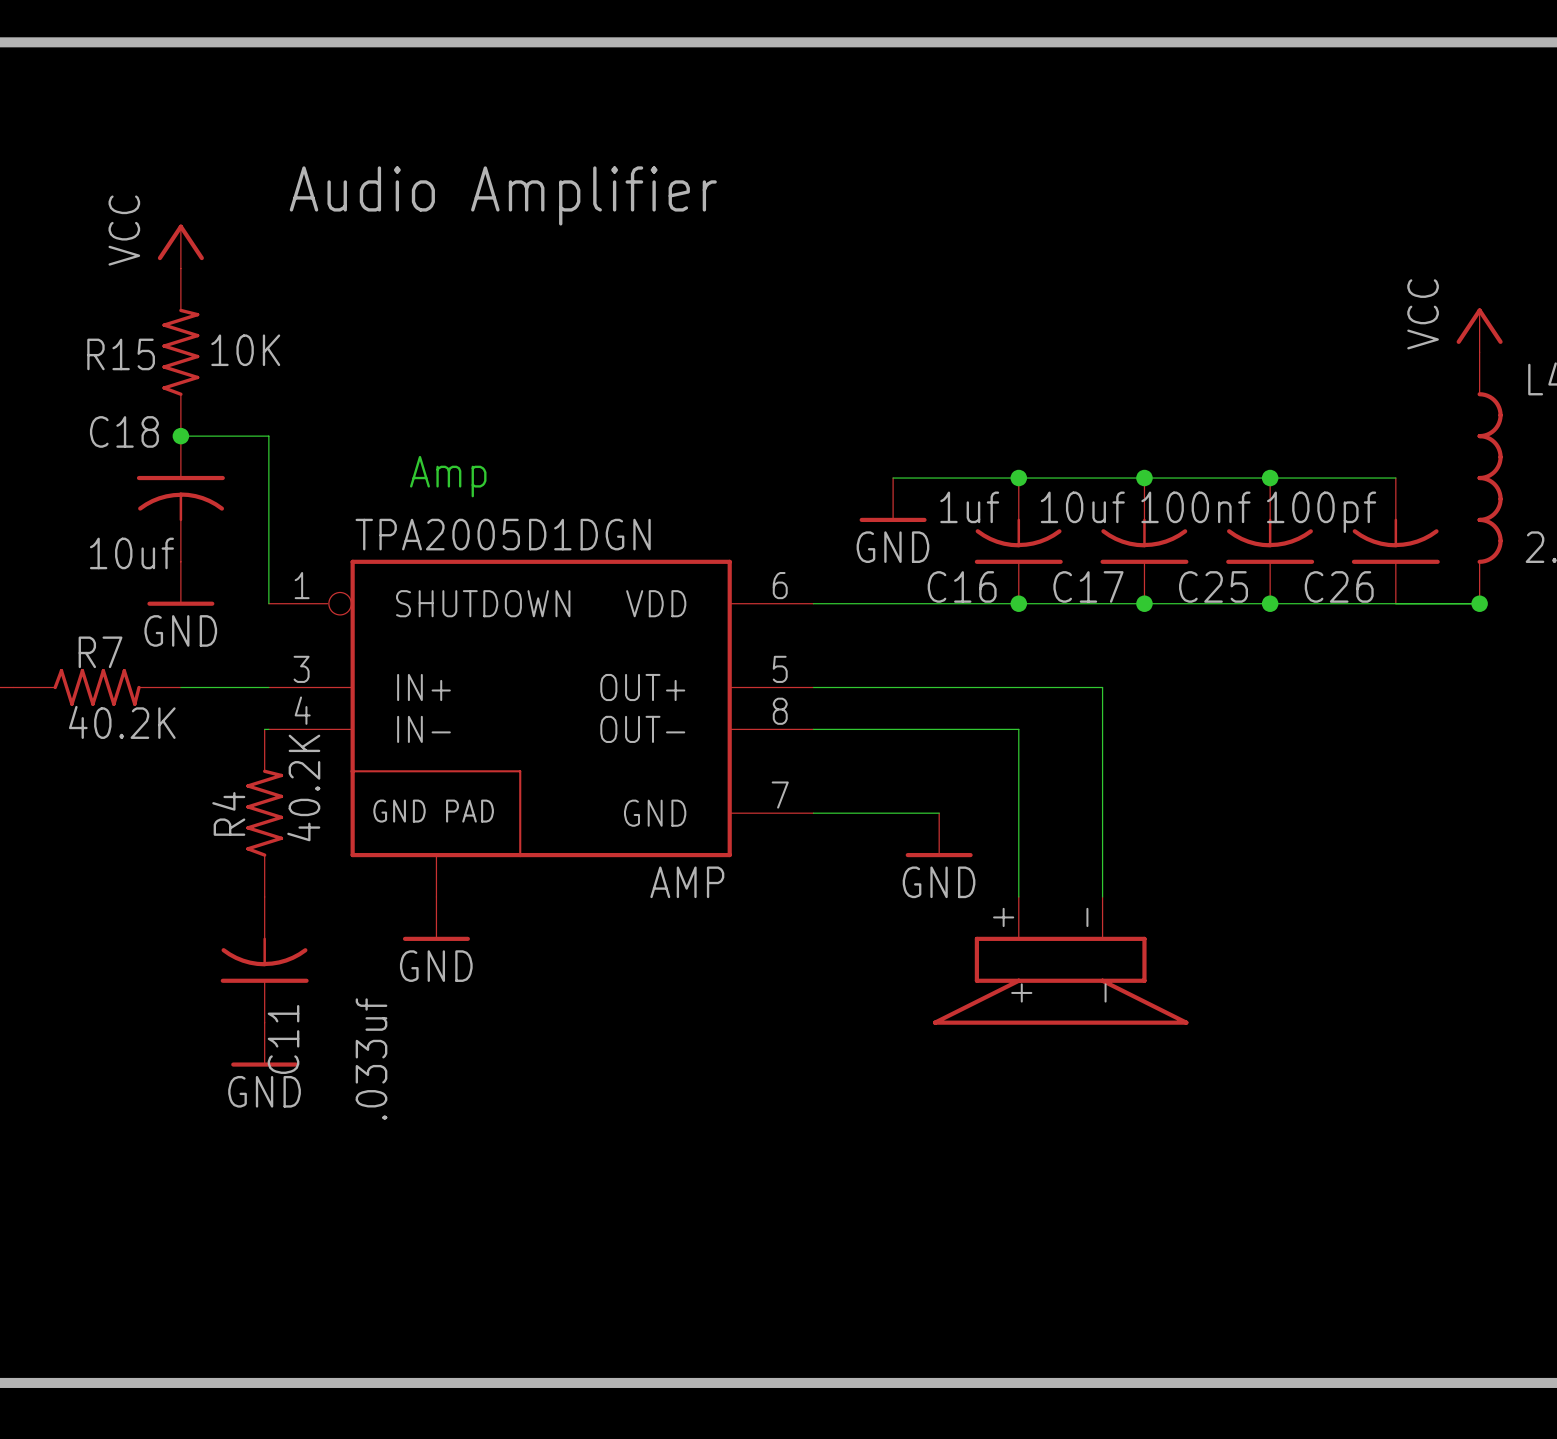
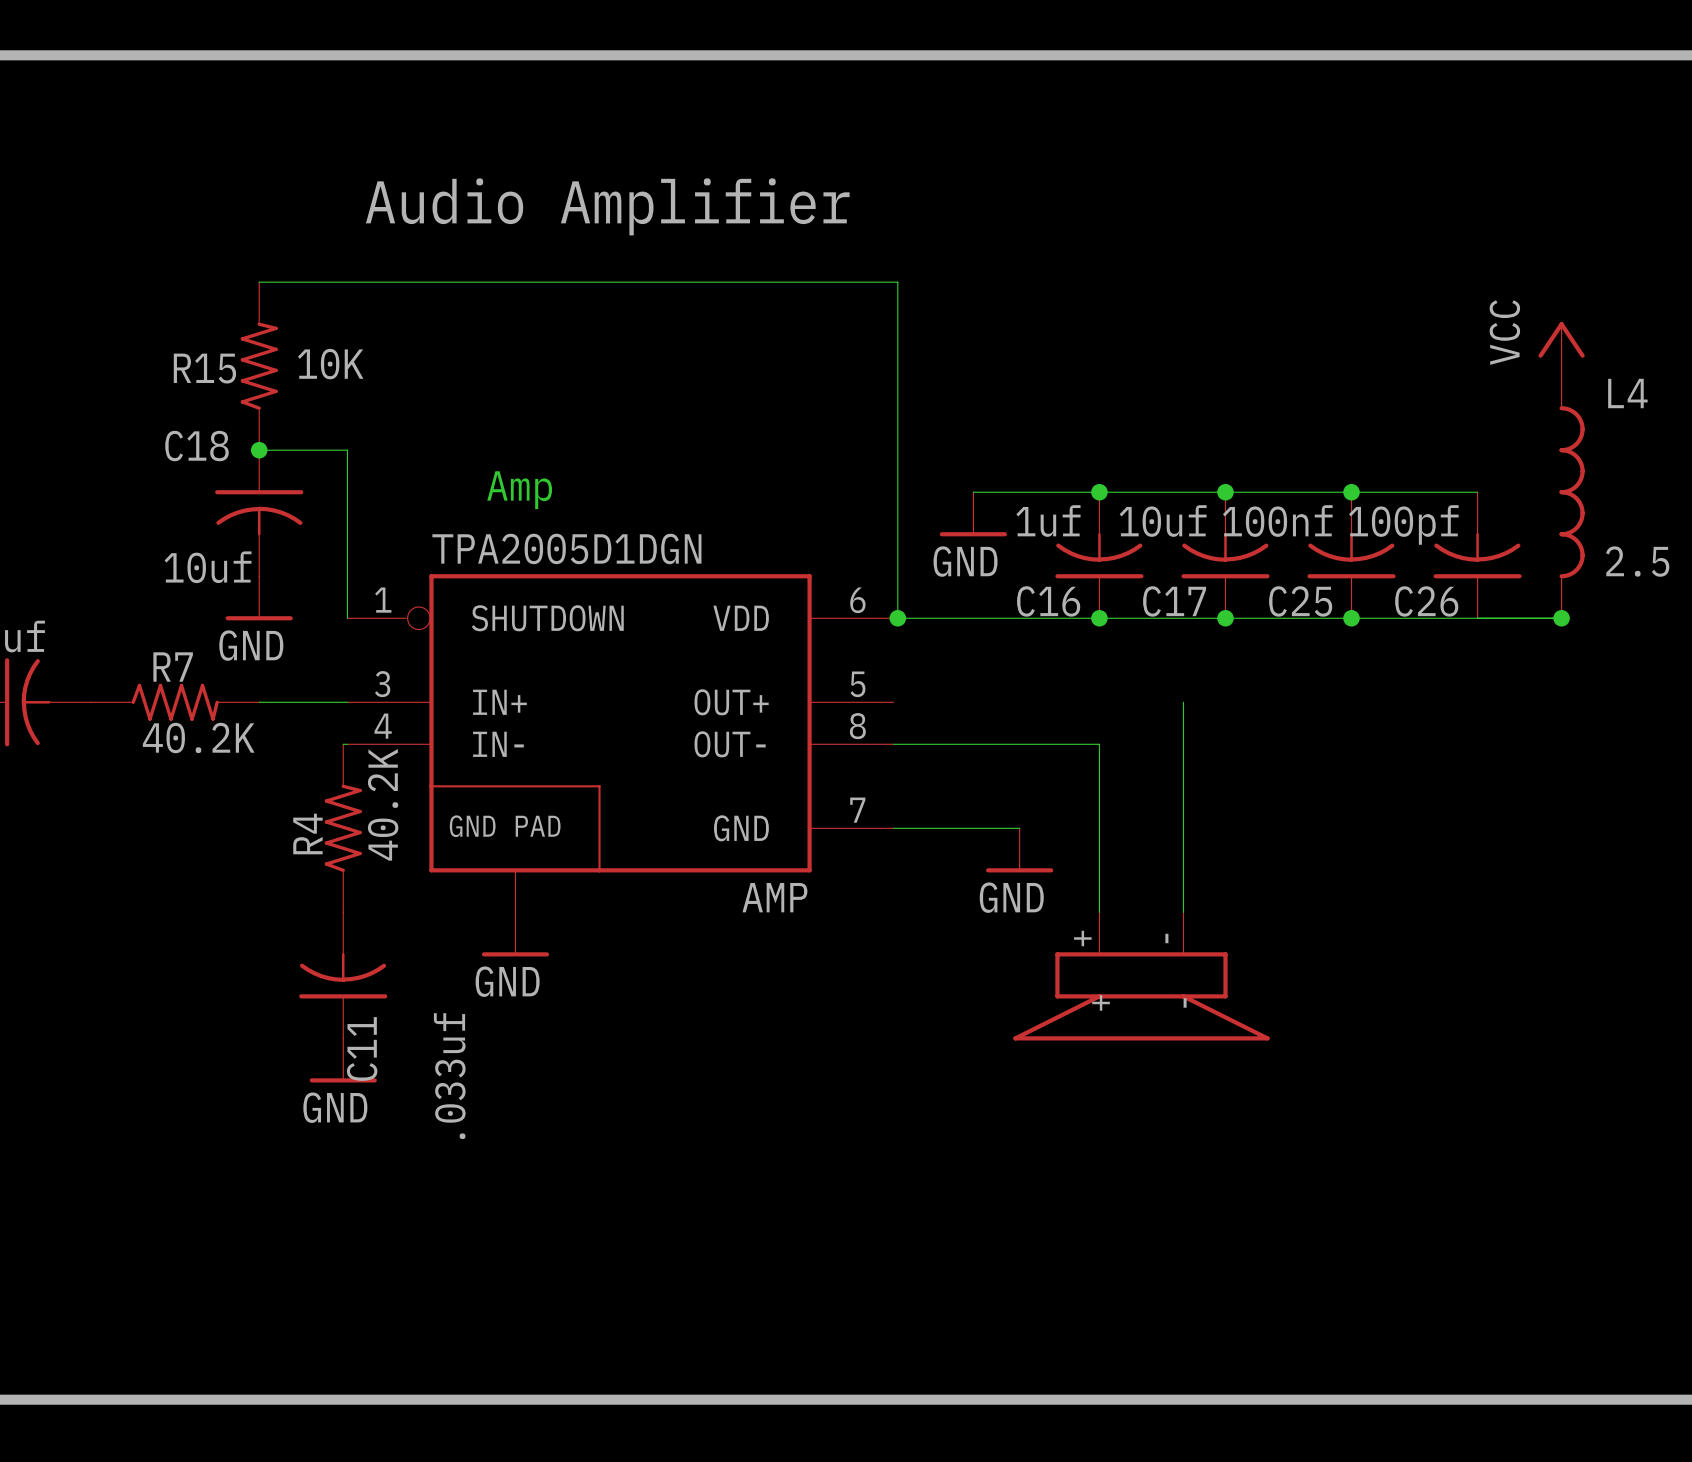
power symbol: VCC (180, 246) -> none
wire: none -> (259, 282) (897, 282) (897, 618)
junction: none -> (897, 618)
wire: (813, 687) (1102, 687) -> none

